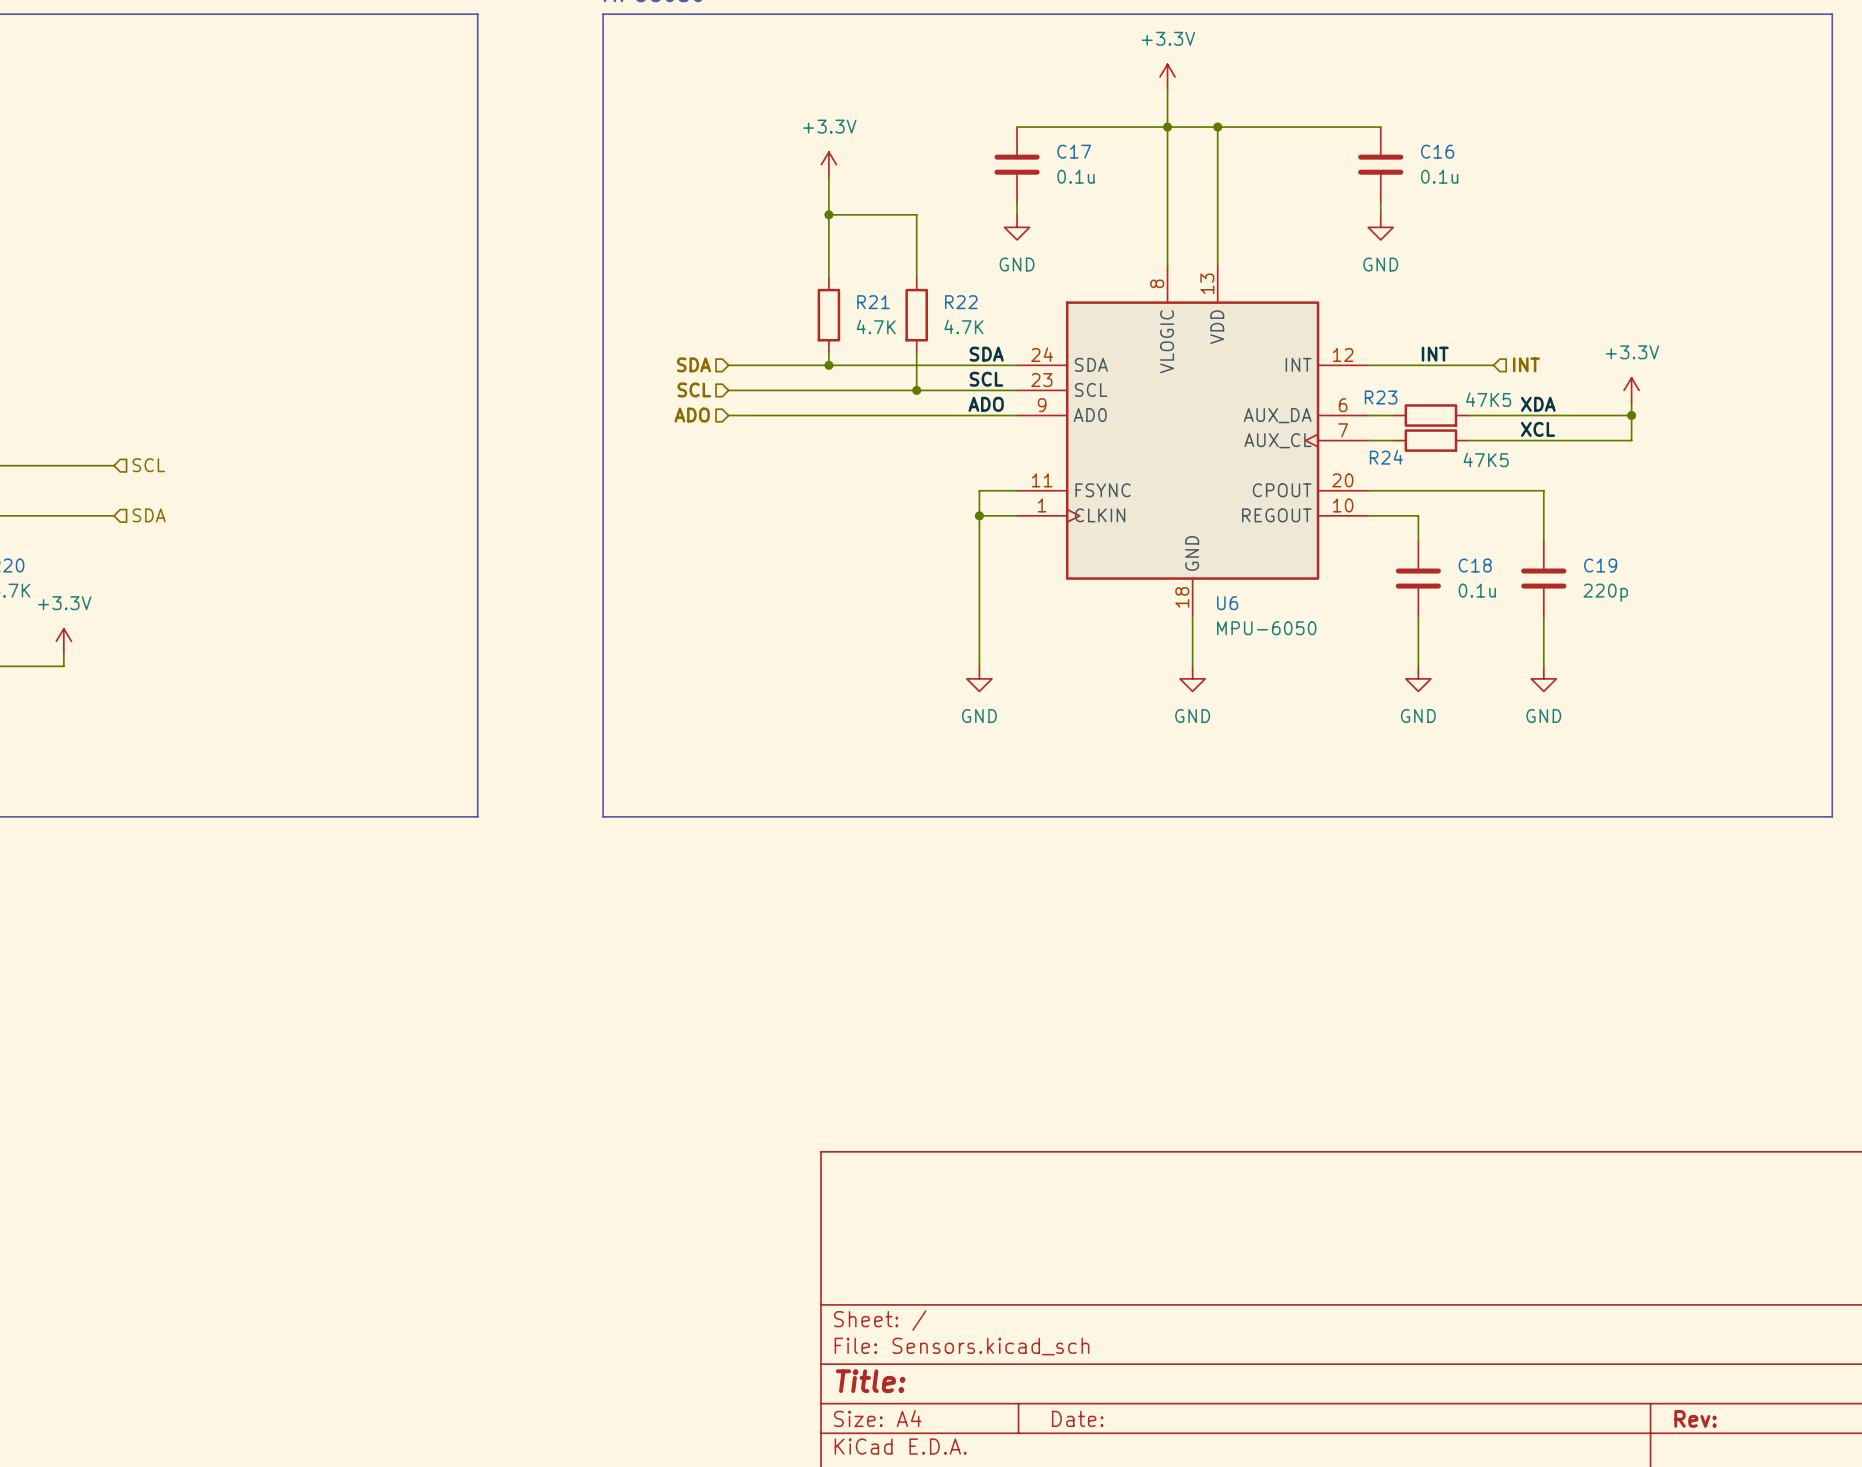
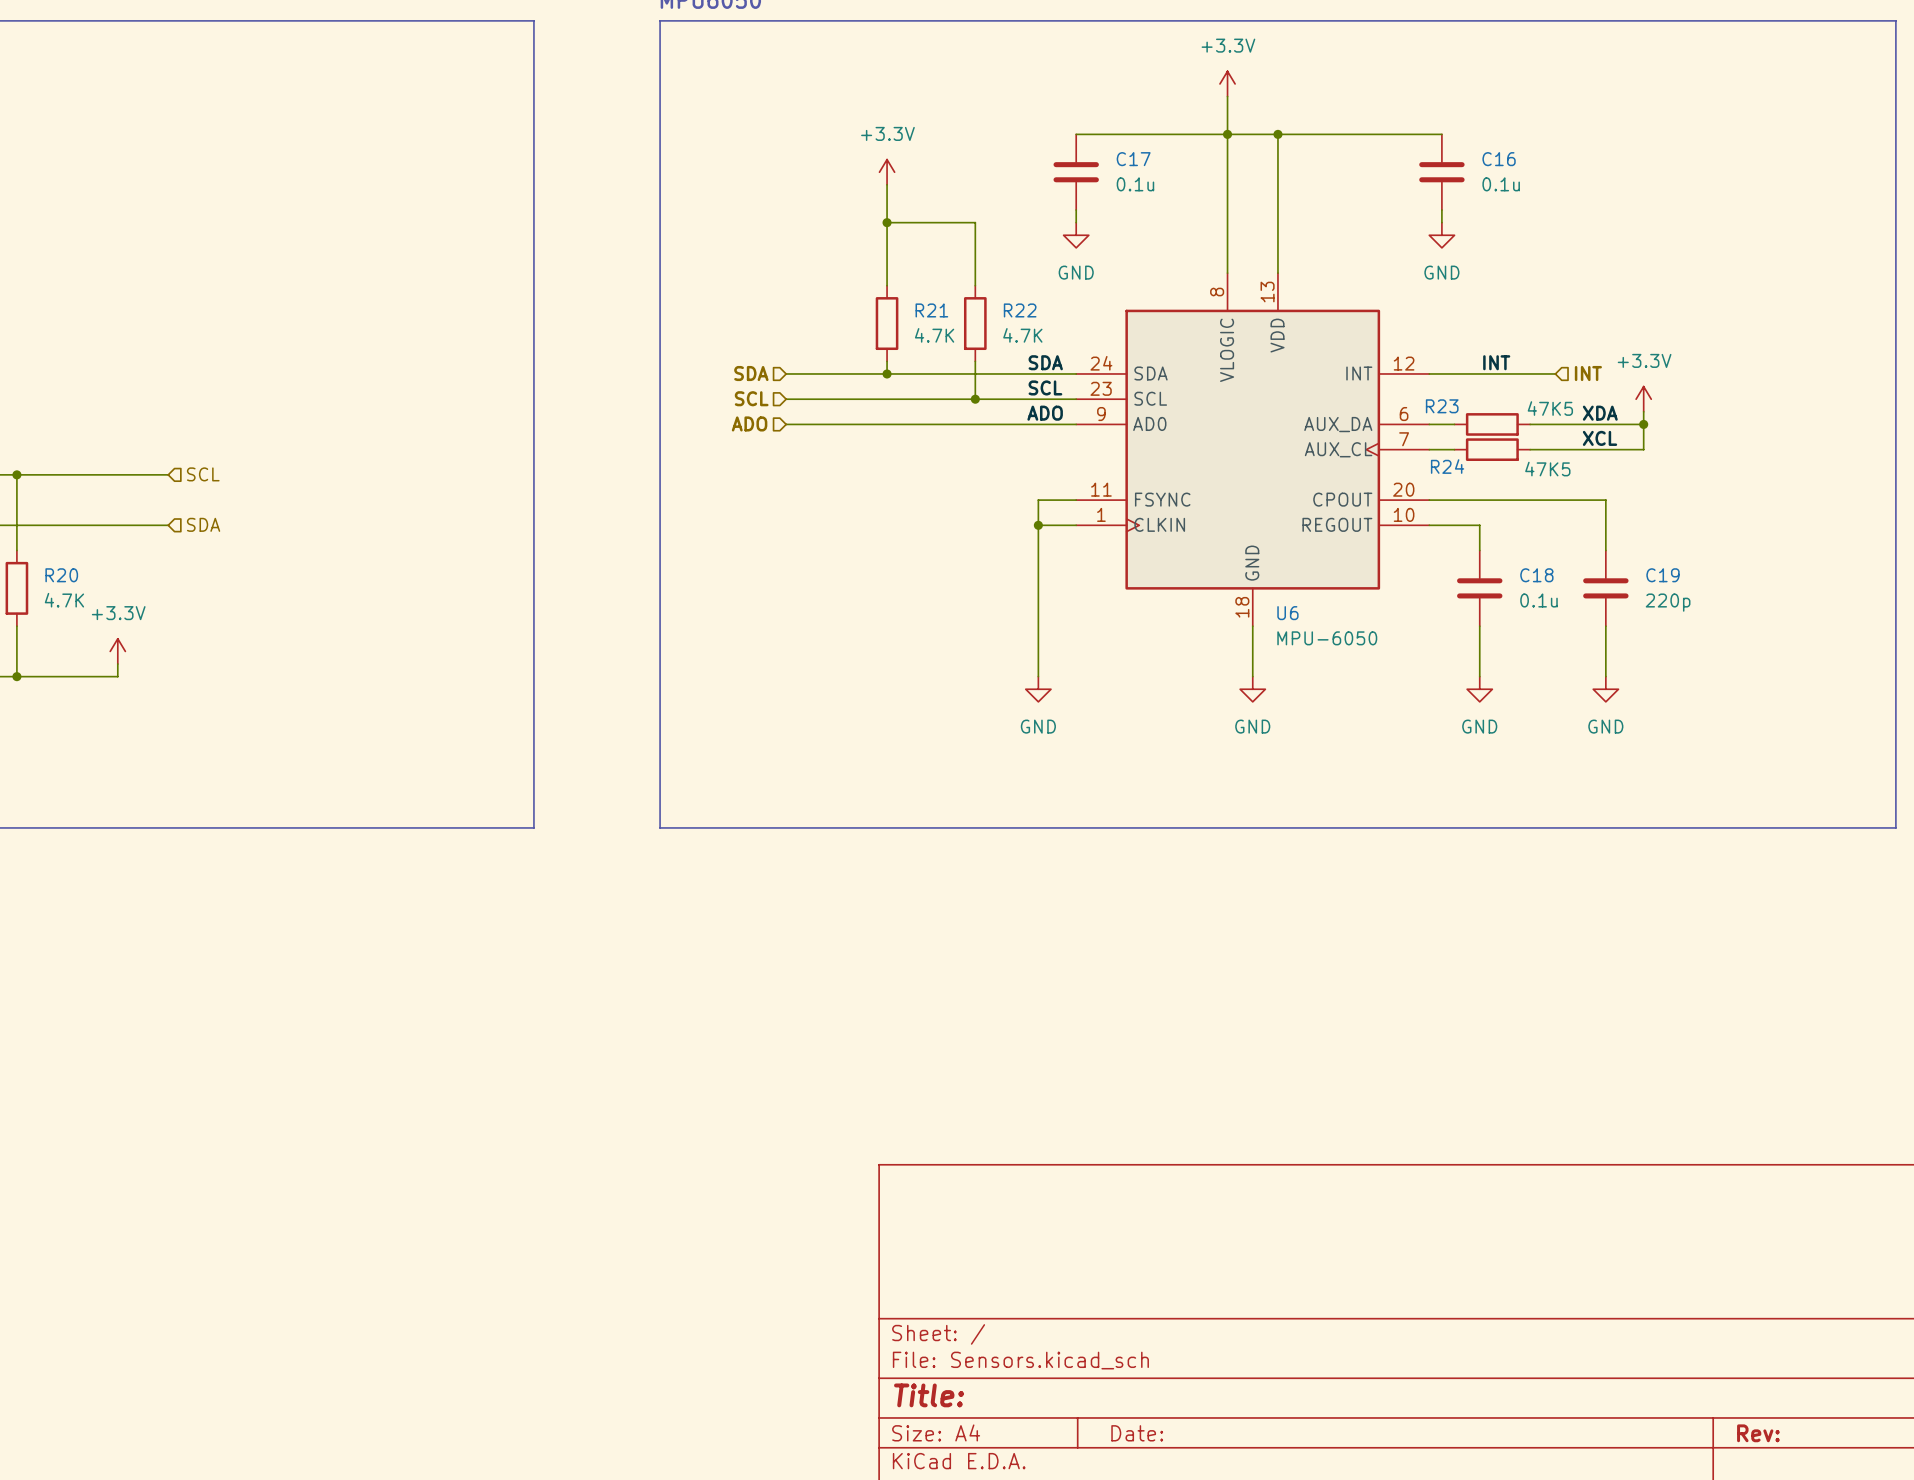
power symbol position: +3.3V (1631, 390) -> +3.3V (1643, 399)
wire: (1631, 402) (1631, 440) (1581, 440) -> (1643, 411) (1643, 449)
wire: (1581, 415) (1631, 415) -> none
junction position: (1631, 415) -> (1643, 424)

